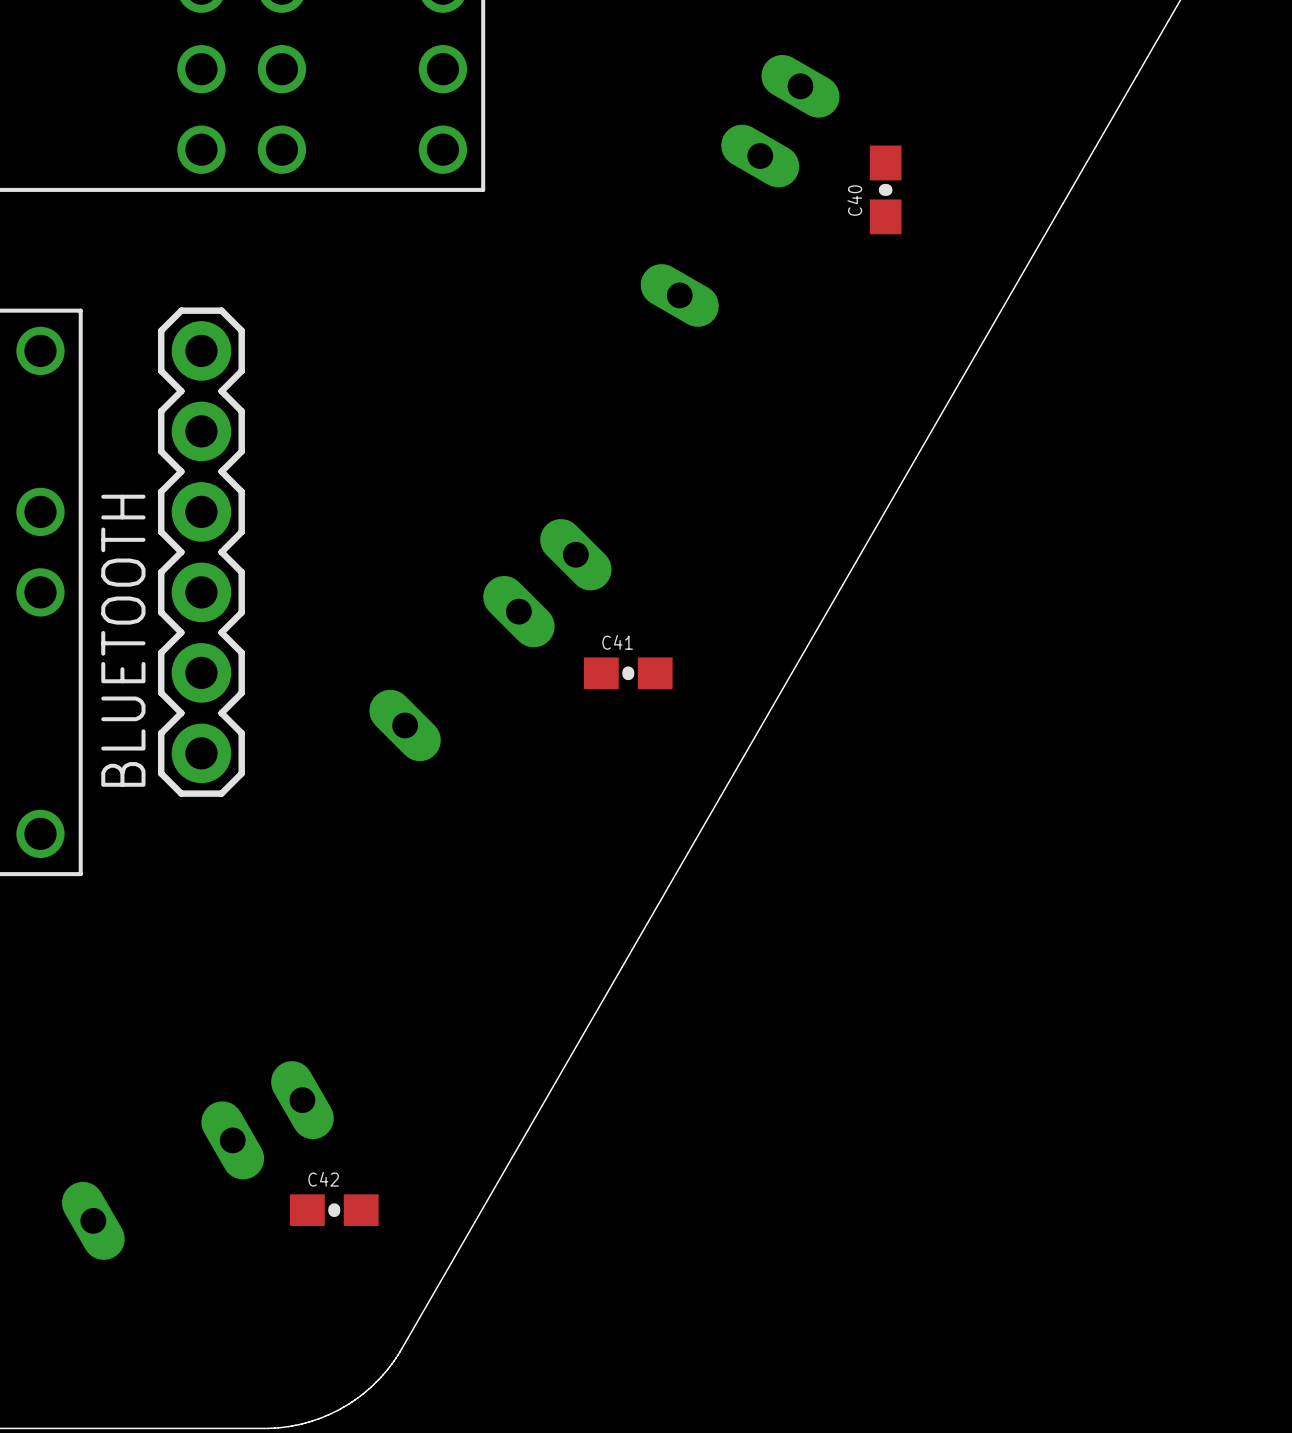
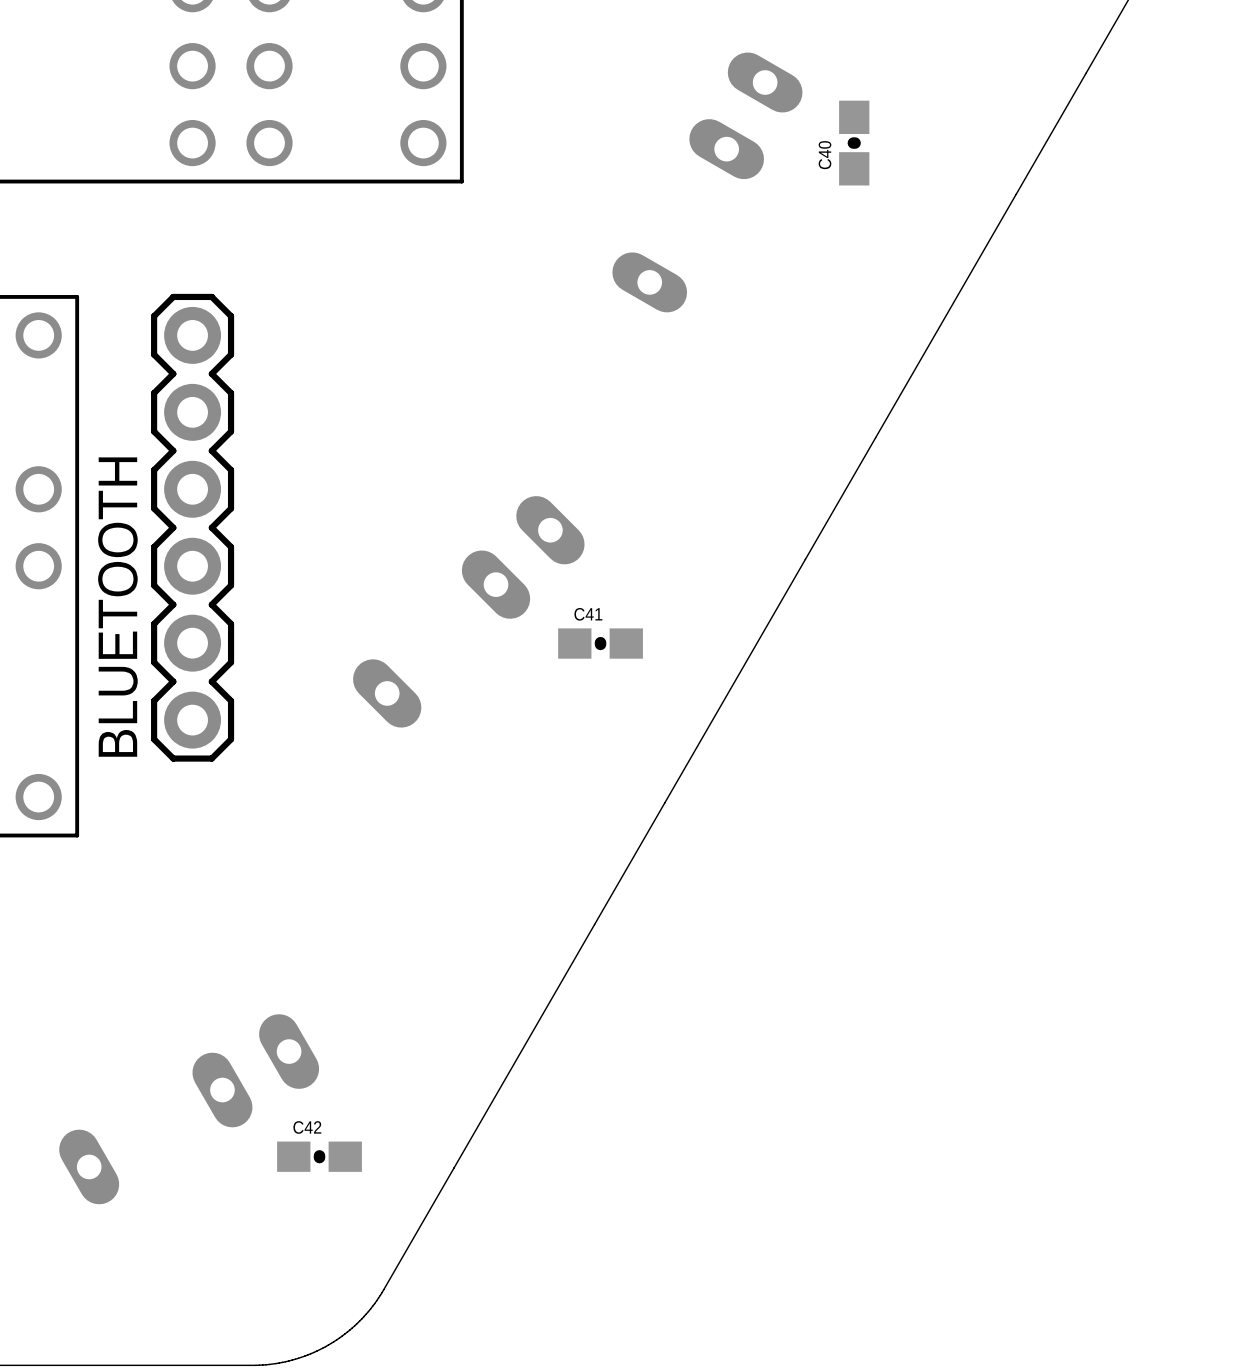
C40 position: (885, 189) -> (854, 143)

